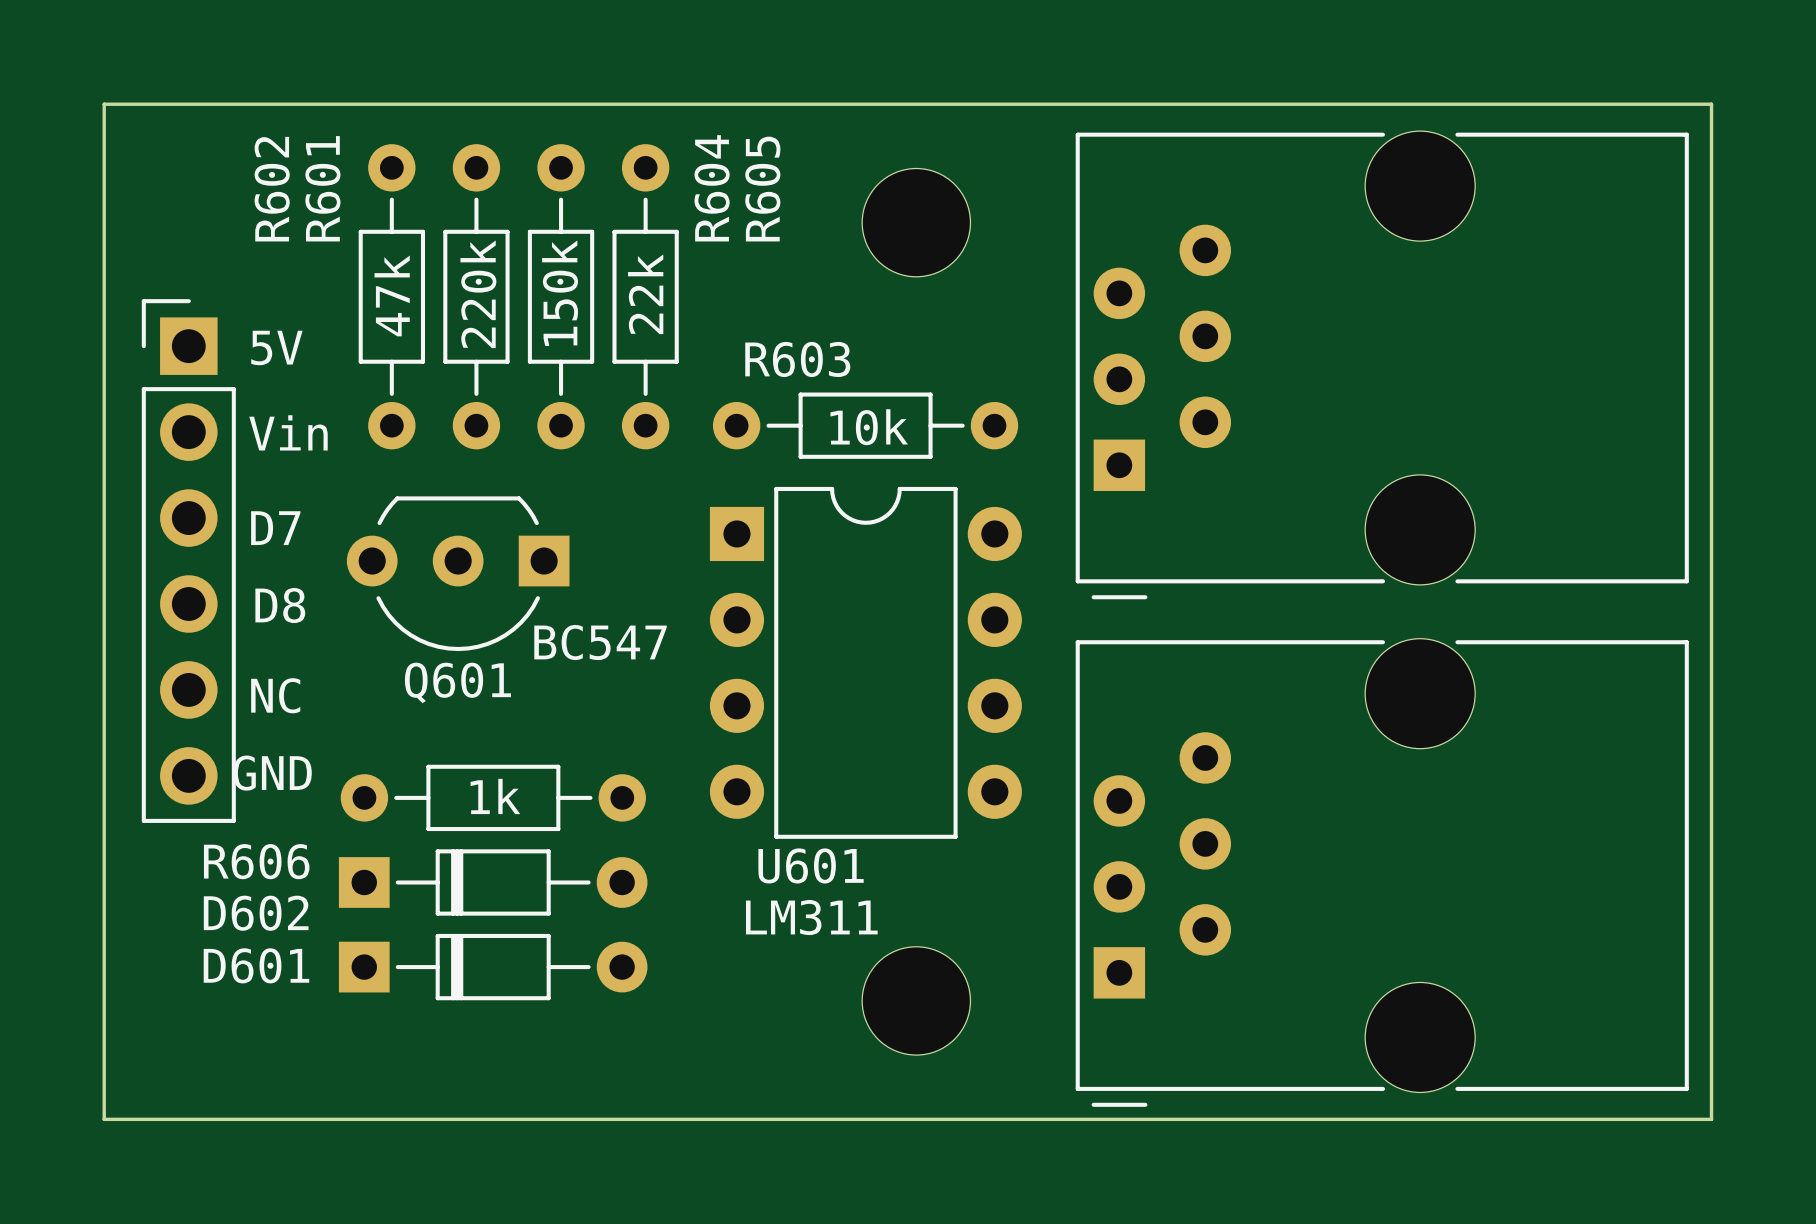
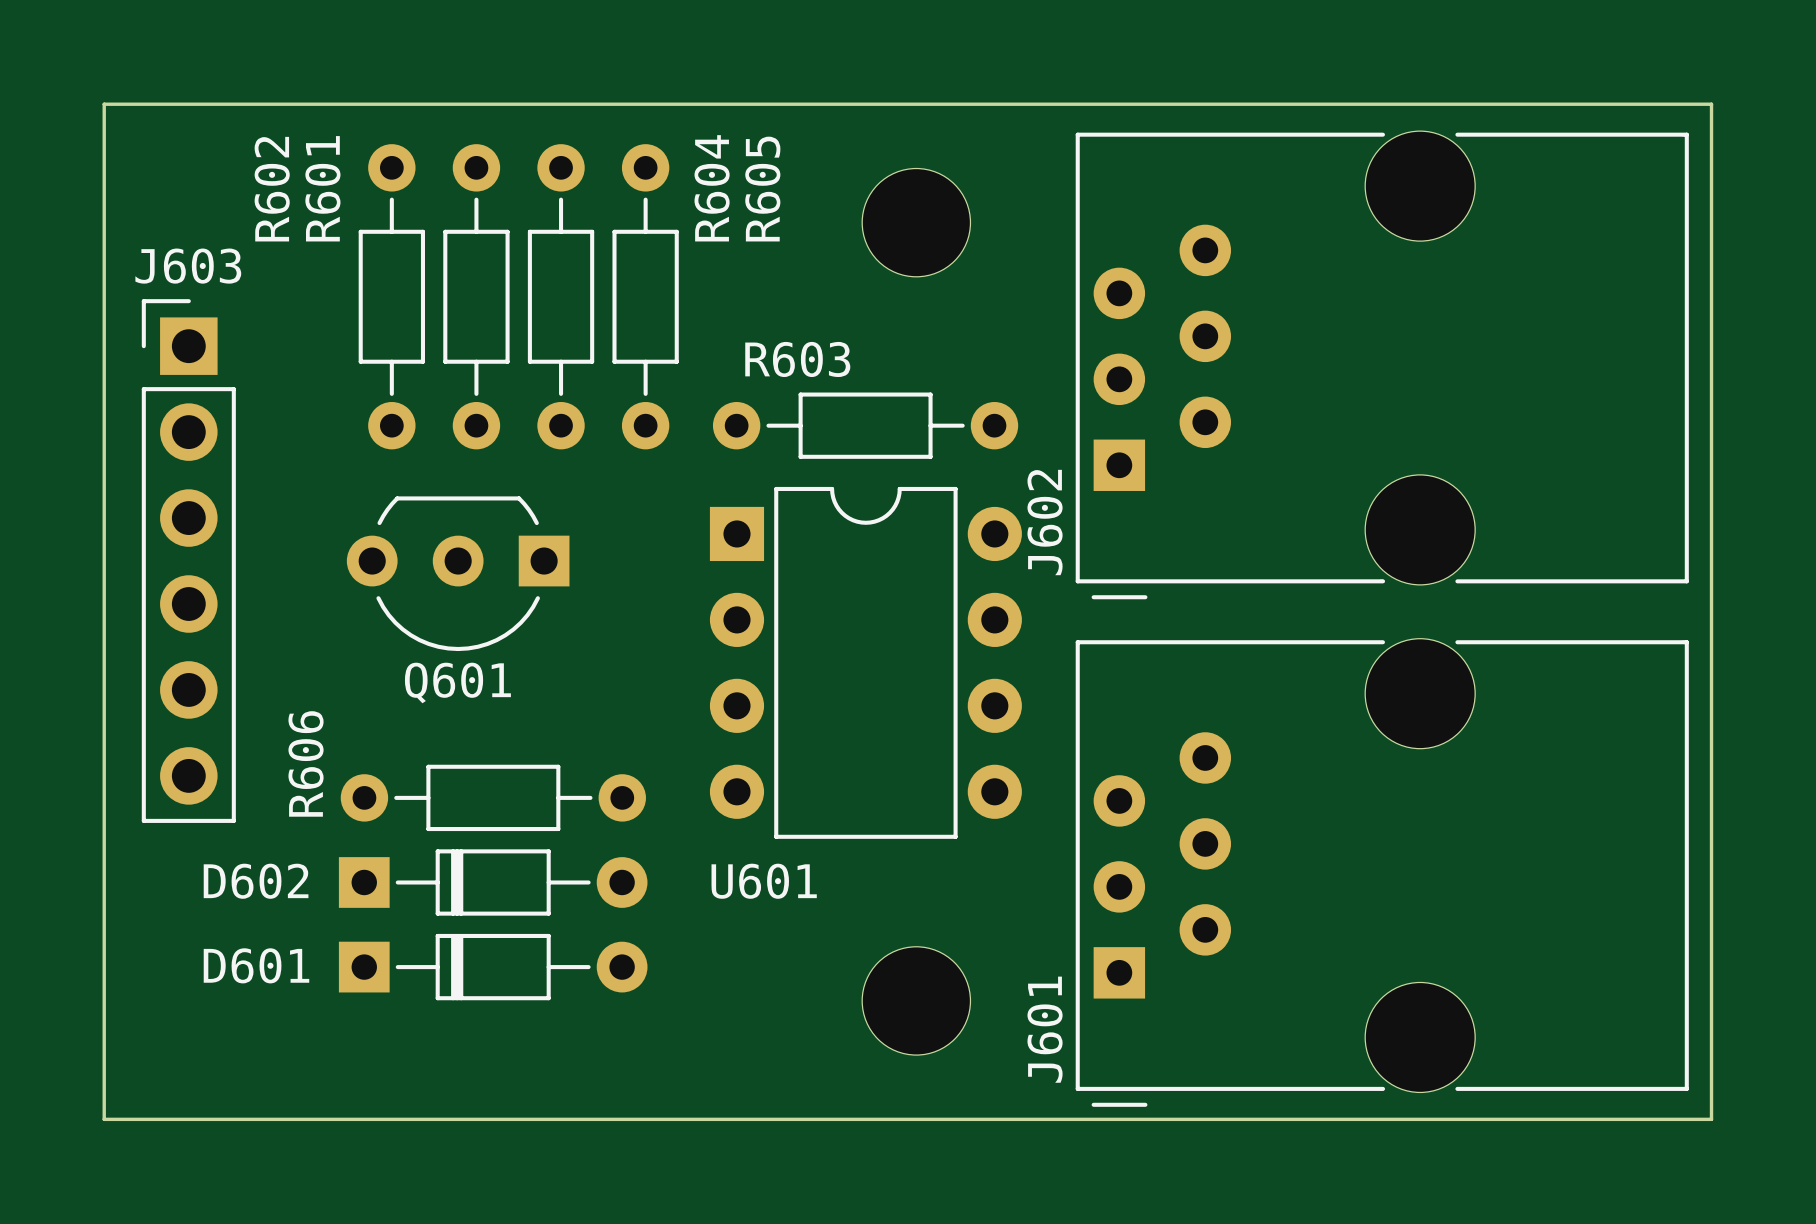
J603 name: none -> J603 (188, 266)
R604 value: 150k (560, 293) -> none
R601 value: 220k (478, 294) -> none
R605 value: 22k (645, 294) -> none
R602 value: 47k (392, 295) -> none
text: 5V (276, 347) -> none
R603 value: 10k (869, 427) -> none
text: Vin (288, 432) -> none
J602 name: none -> J602 (1045, 522)
text: D7 (275, 528) -> none
text: D8 (280, 605) -> none
Q601 value: BC547 (600, 642) -> none
text: NC (275, 695) -> none
text: GND (272, 773) -> none
R606 value: 1k (495, 796) -> none
R606 name rotation: 0° (256, 861) -> 90° counterclockwise (306, 763)
U601 name position: U601 (811, 865) -> U601 (764, 881)
D602 name position: D602 (256, 913) -> D602 (256, 881)
U601 value: LM311 (811, 917) -> none
J601 name: none -> J601 (1045, 1029)

